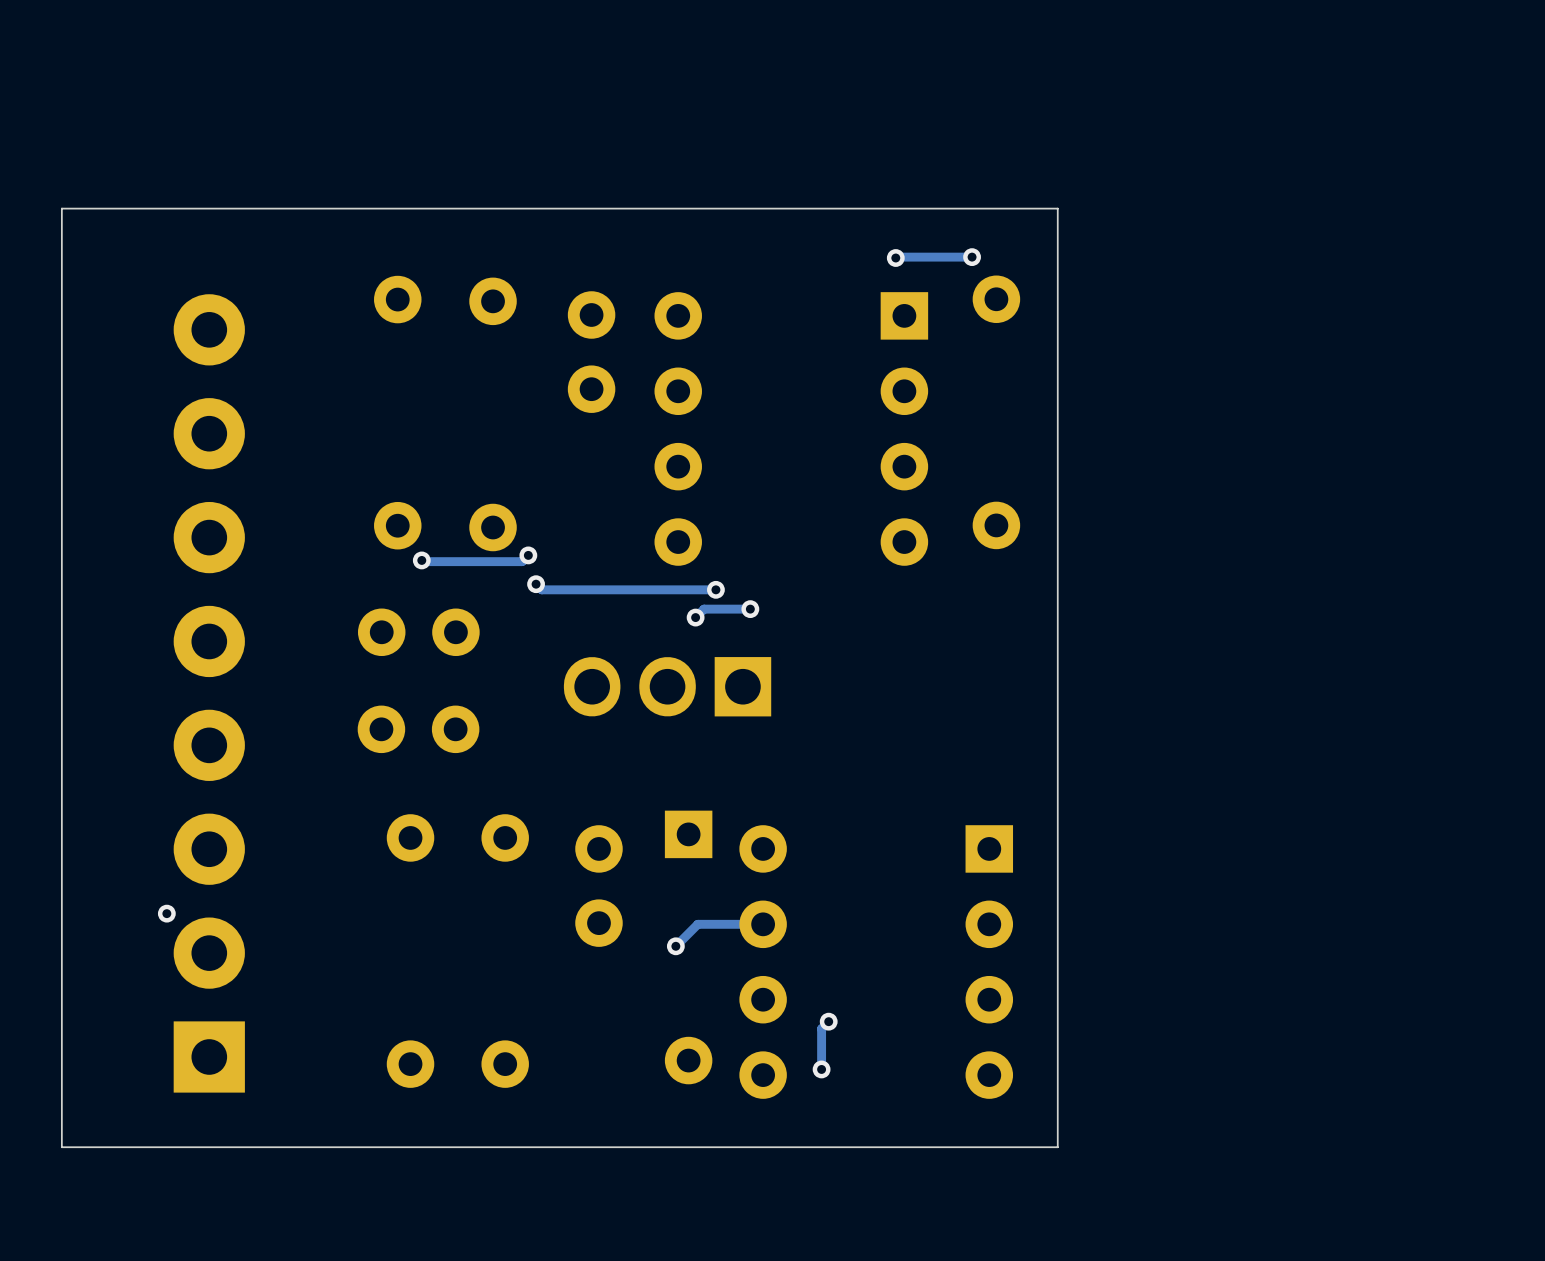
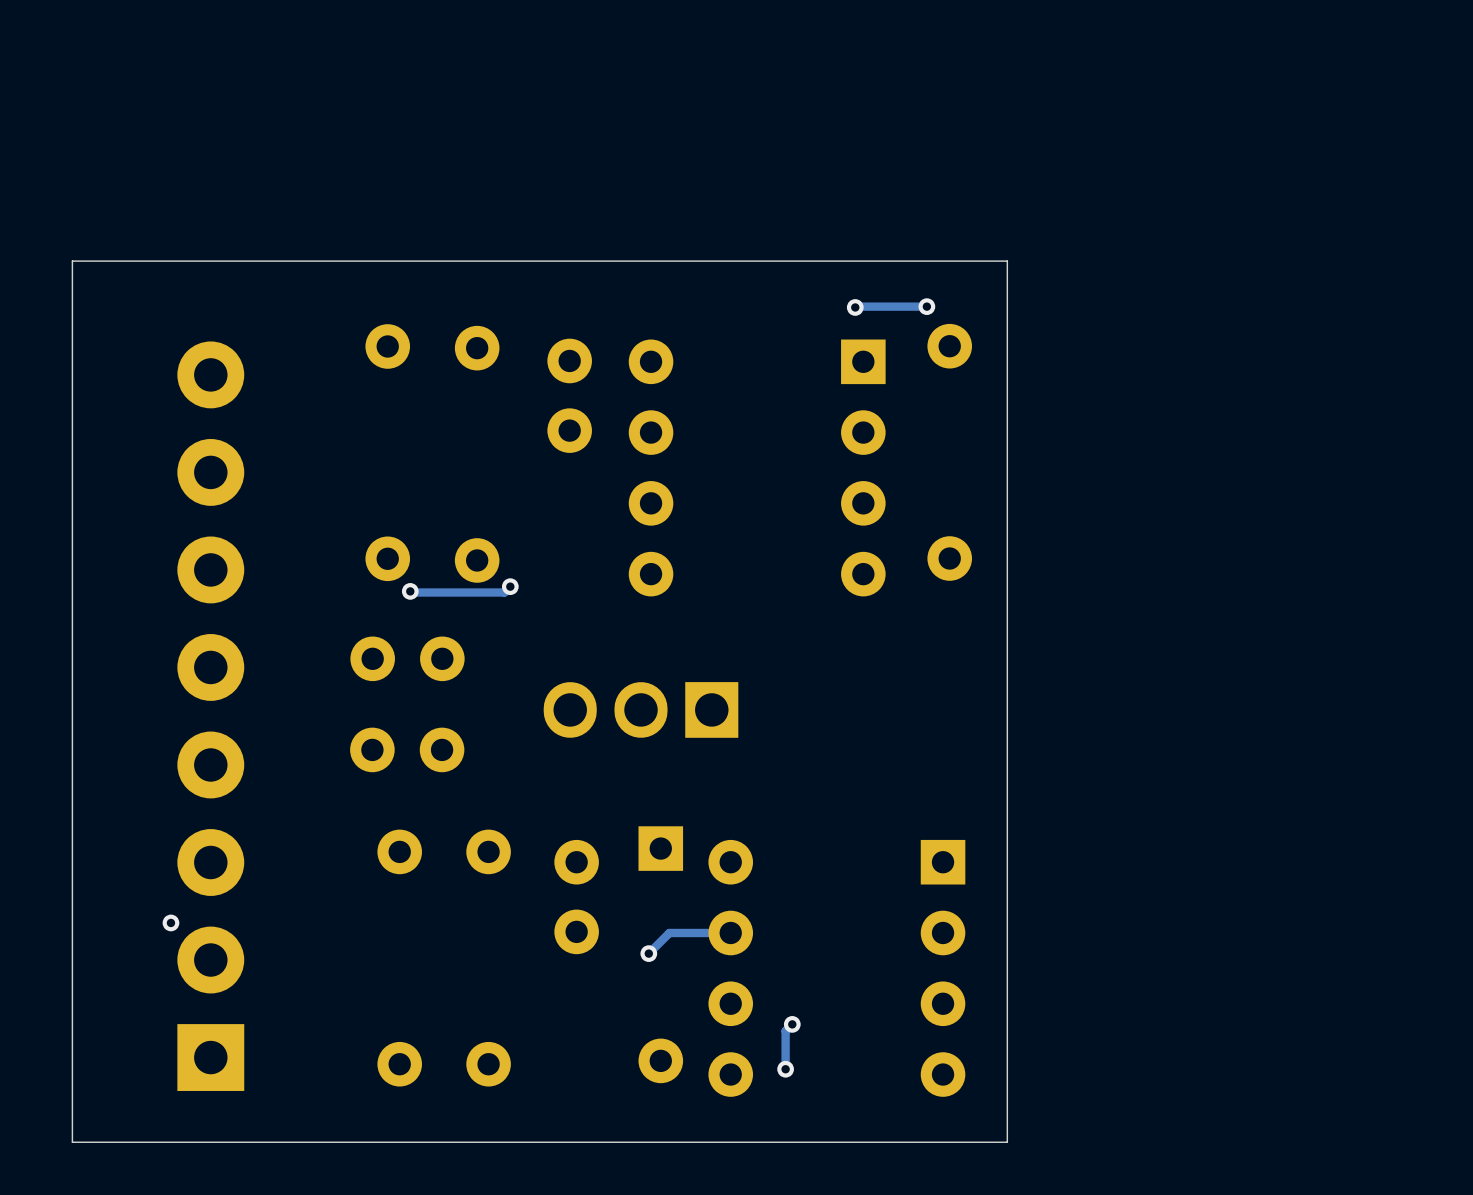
track: (536, 584) (541, 589) (715, 589) -> none
via: (536, 584) -> none
via: (715, 589) -> none
track: (750, 609) (704, 609) (695, 617) -> none
via: (750, 609) -> none
via: (695, 617) -> none

